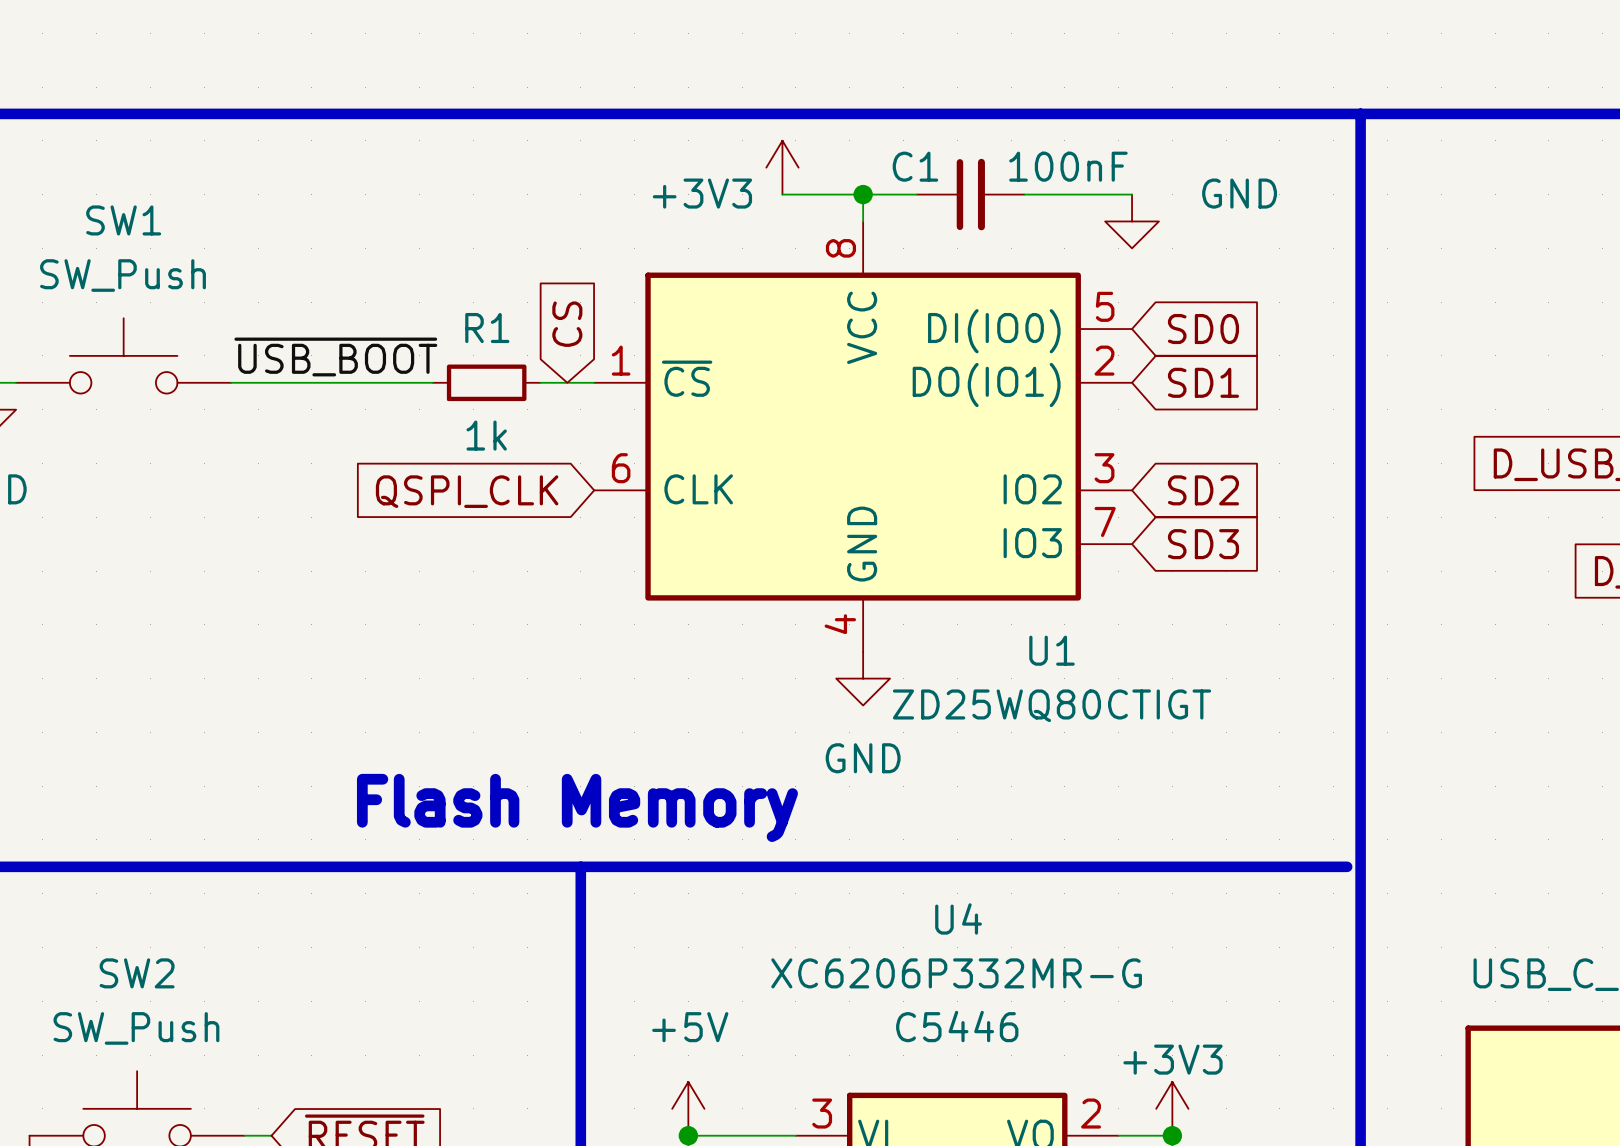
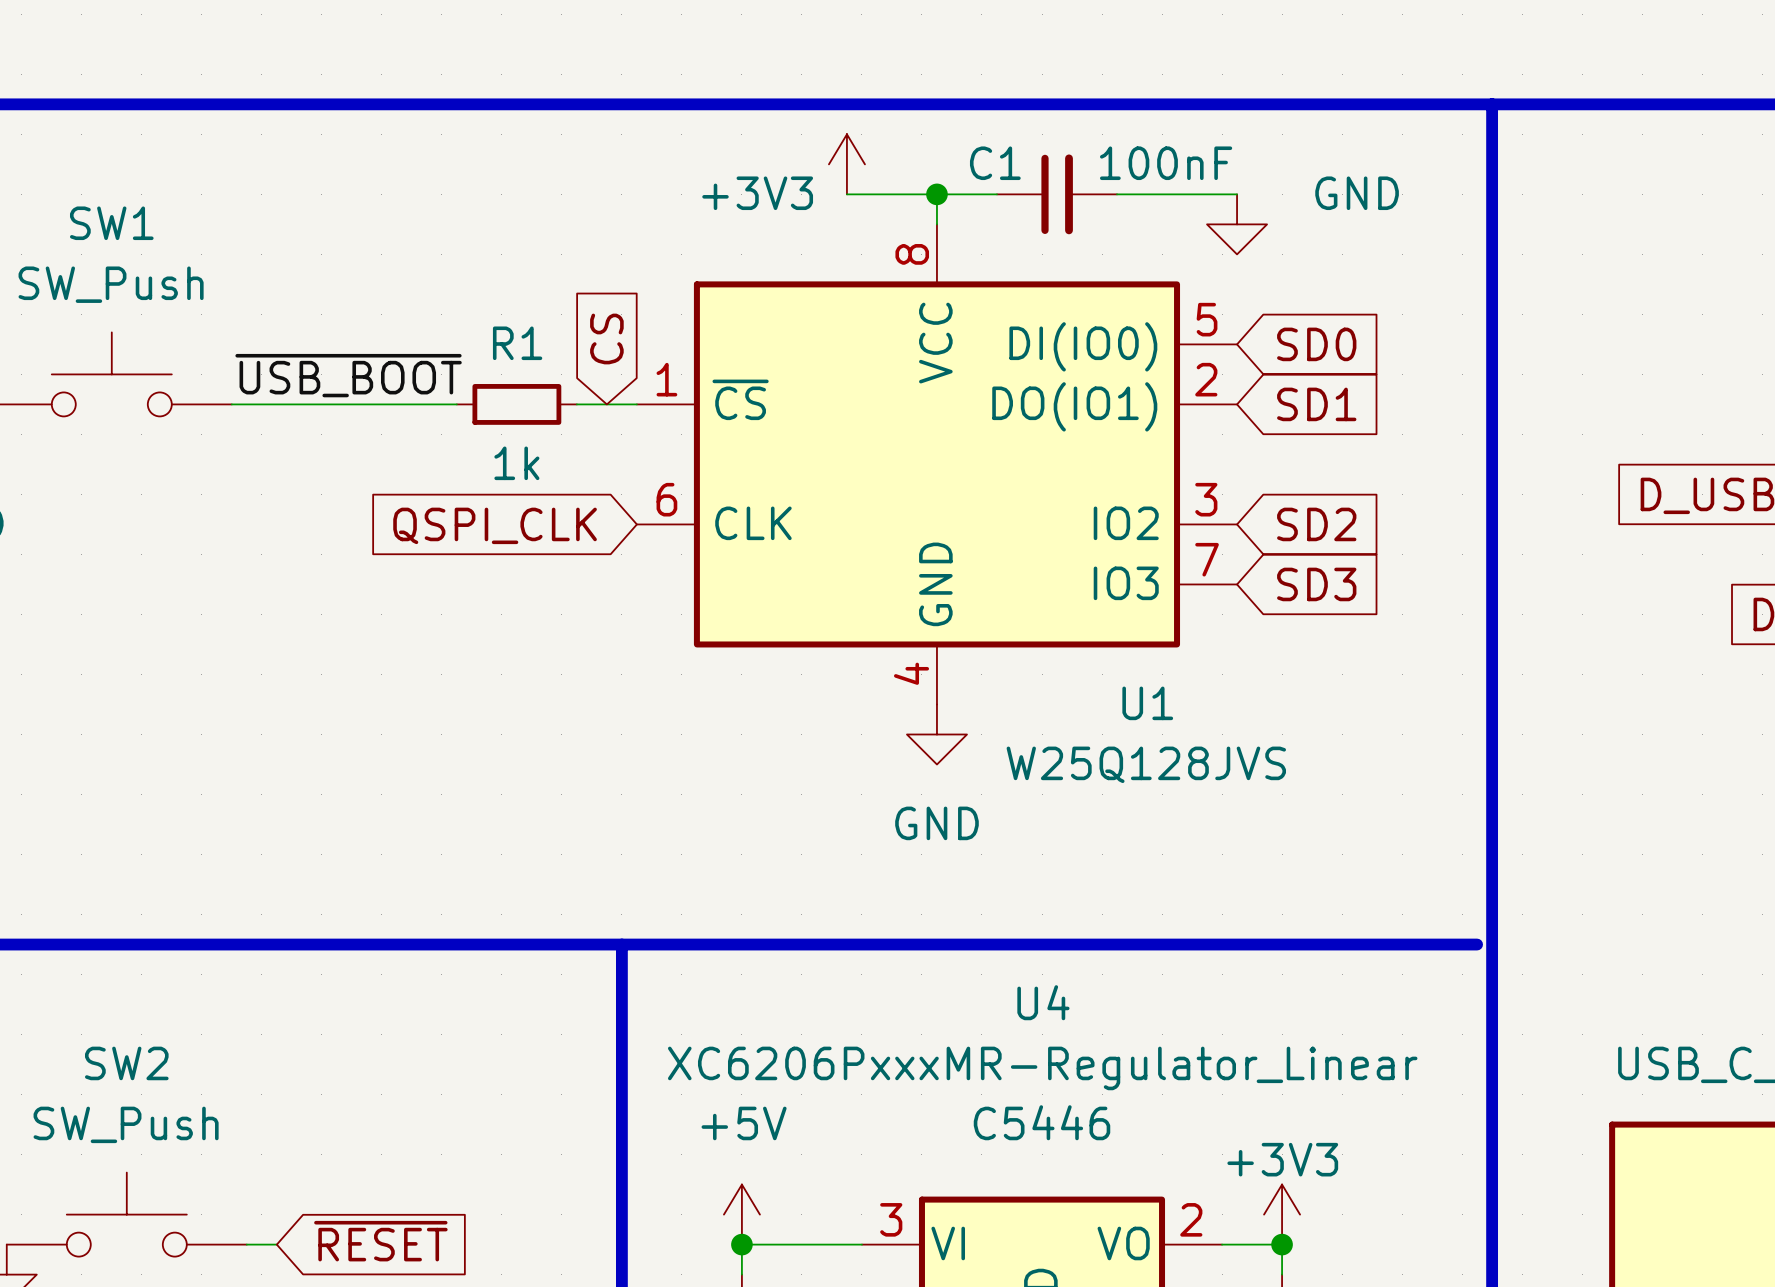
U1 value: ZD25WQ80CTIGT (1052, 705) -> W25Q128JVS (1146, 764)
text: Flash Memory (577, 807) -> none
U4 value: XC6206P332MR-G (956, 973) -> XC6206PxxxMR-Regulator_Linear (1042, 1068)

